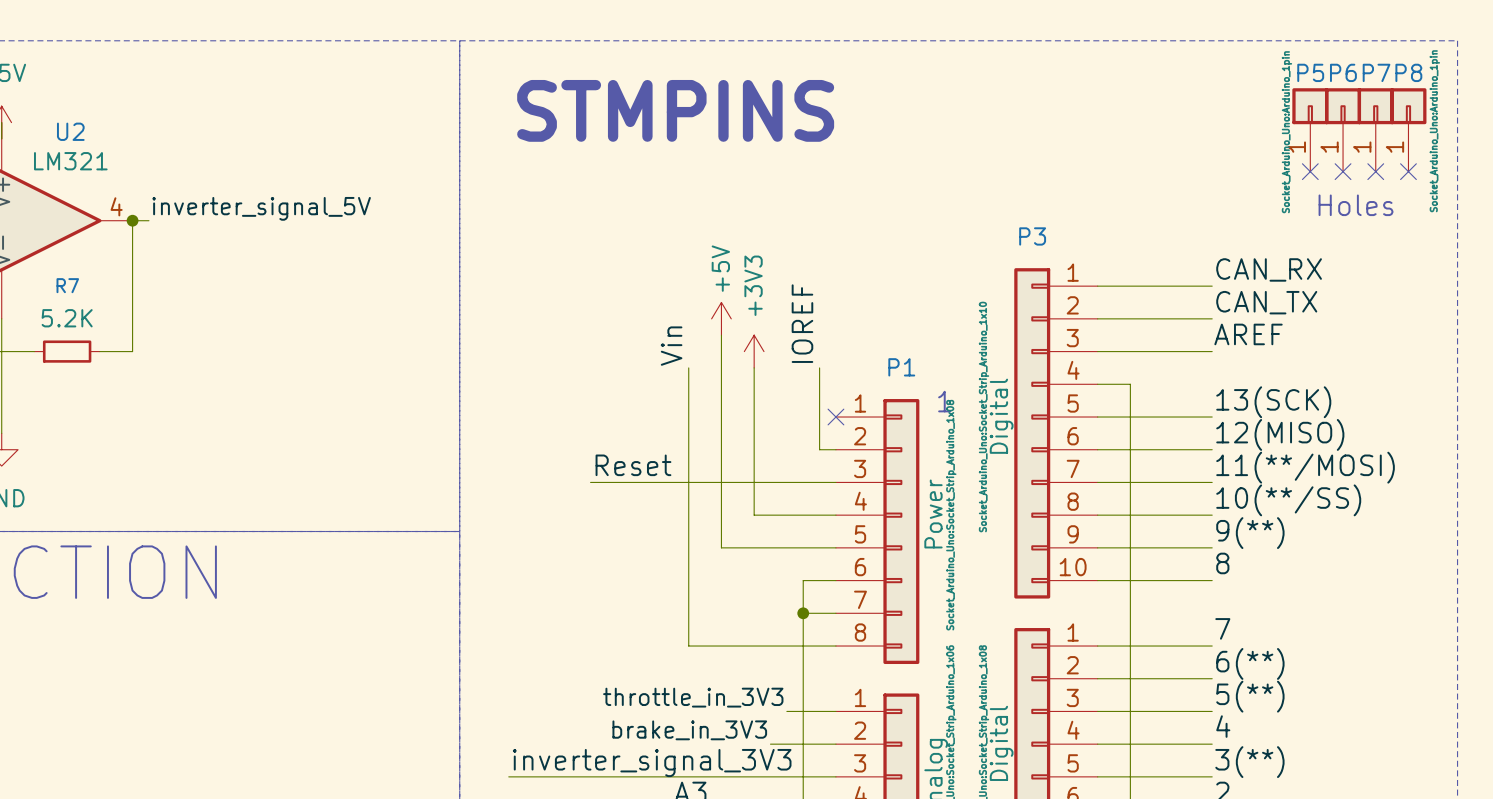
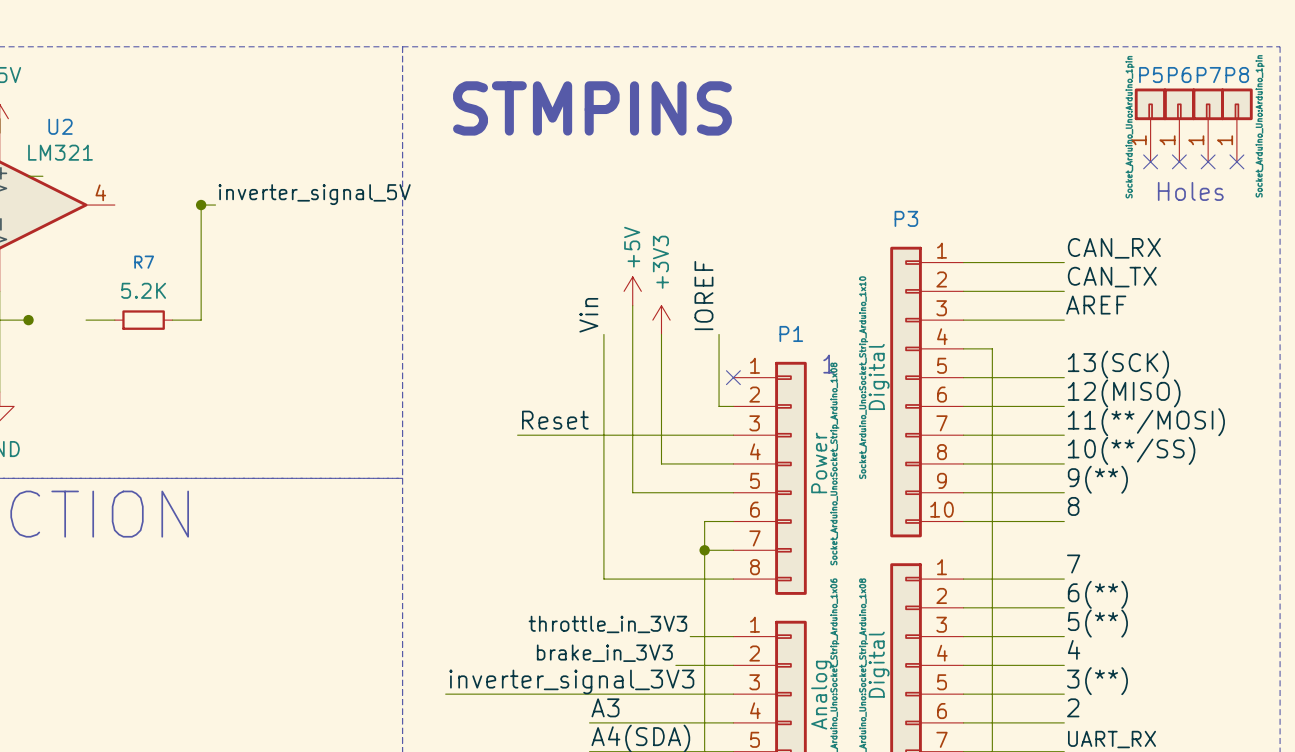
wire: none -> (28, 176) (42, 176)
label position: inverter_signal_5V (261, 208) -> inverter_signal_5V (314, 194)
junction: (132, 220) -> none
wire: (148, 220) (132, 220) (132, 351) -> none
junction: none -> (201, 205)
wire: none -> (215, 205) (201, 205) (201, 320) (172, 320)
junction: none -> (28, 320)
R7 position: (67, 351) -> (143, 320)

